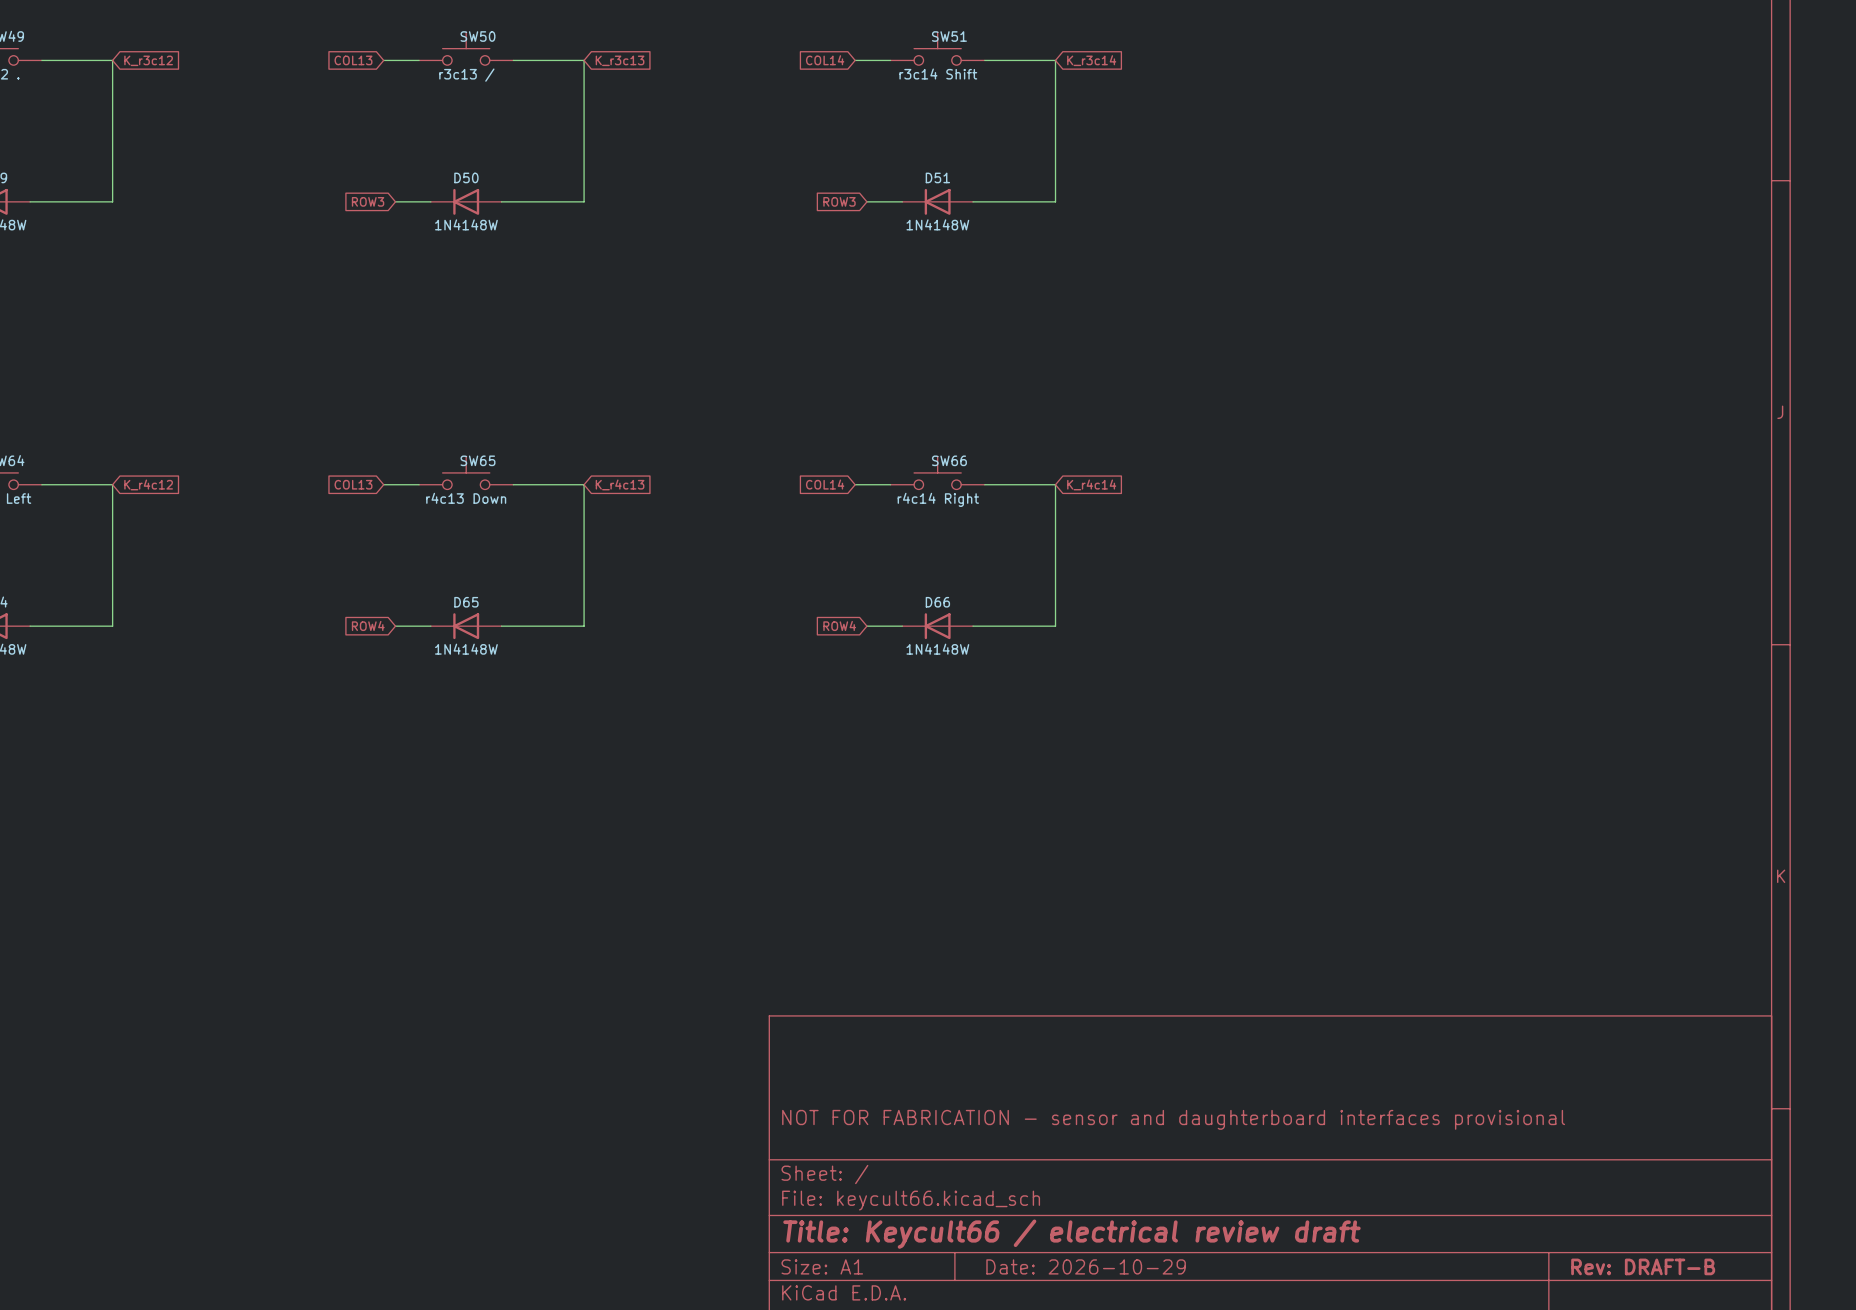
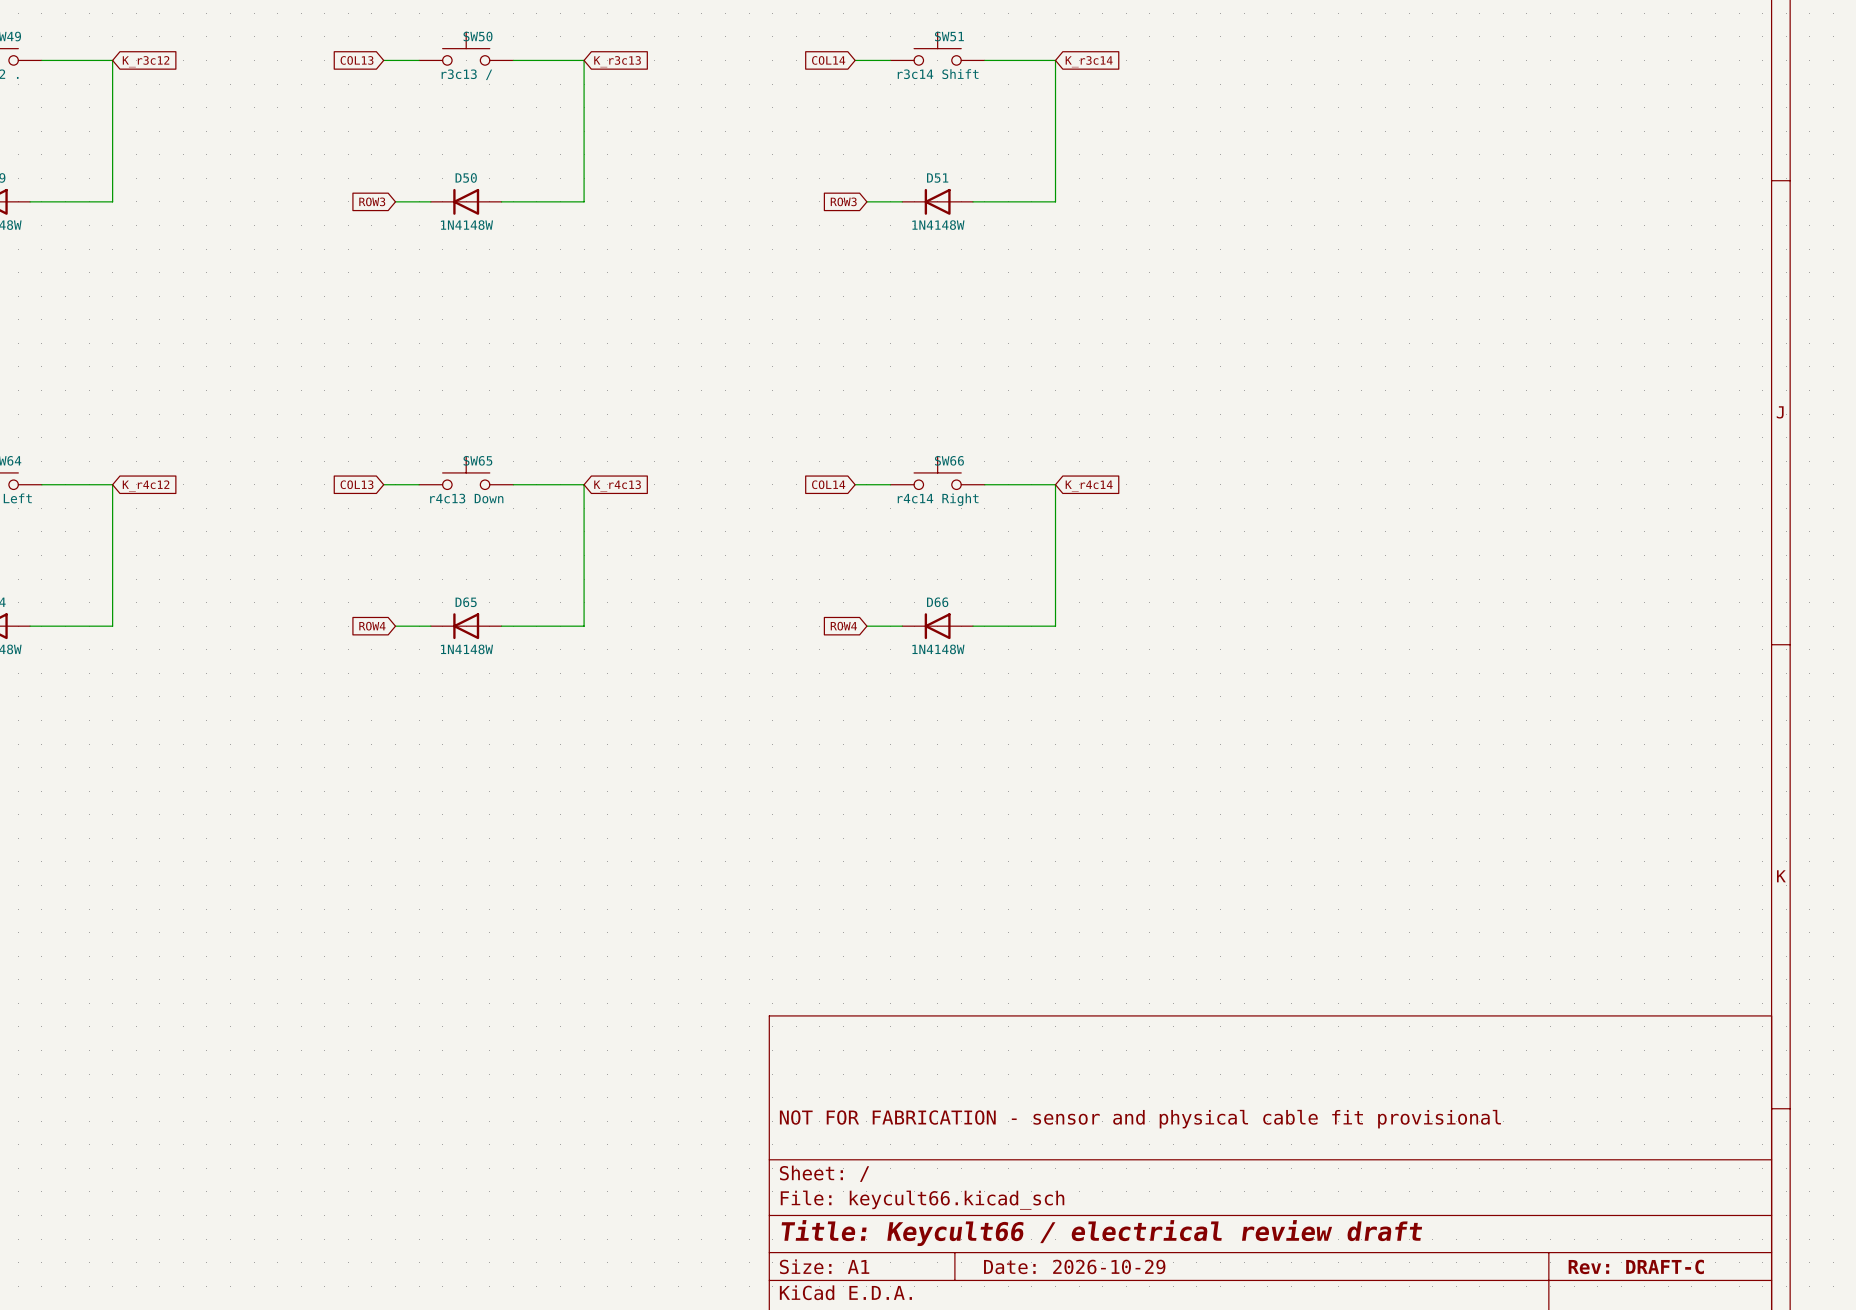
title block: NOT FOR FABRICATION - sensor and daughterboard interfaces provisional (1173, 1119) -> NOT FOR FABRICATION - sensor and physical cable fit provisional (1140, 1119)
title block: Rev: DRAFT-B (1643, 1266) -> Rev: DRAFT-C (1636, 1266)

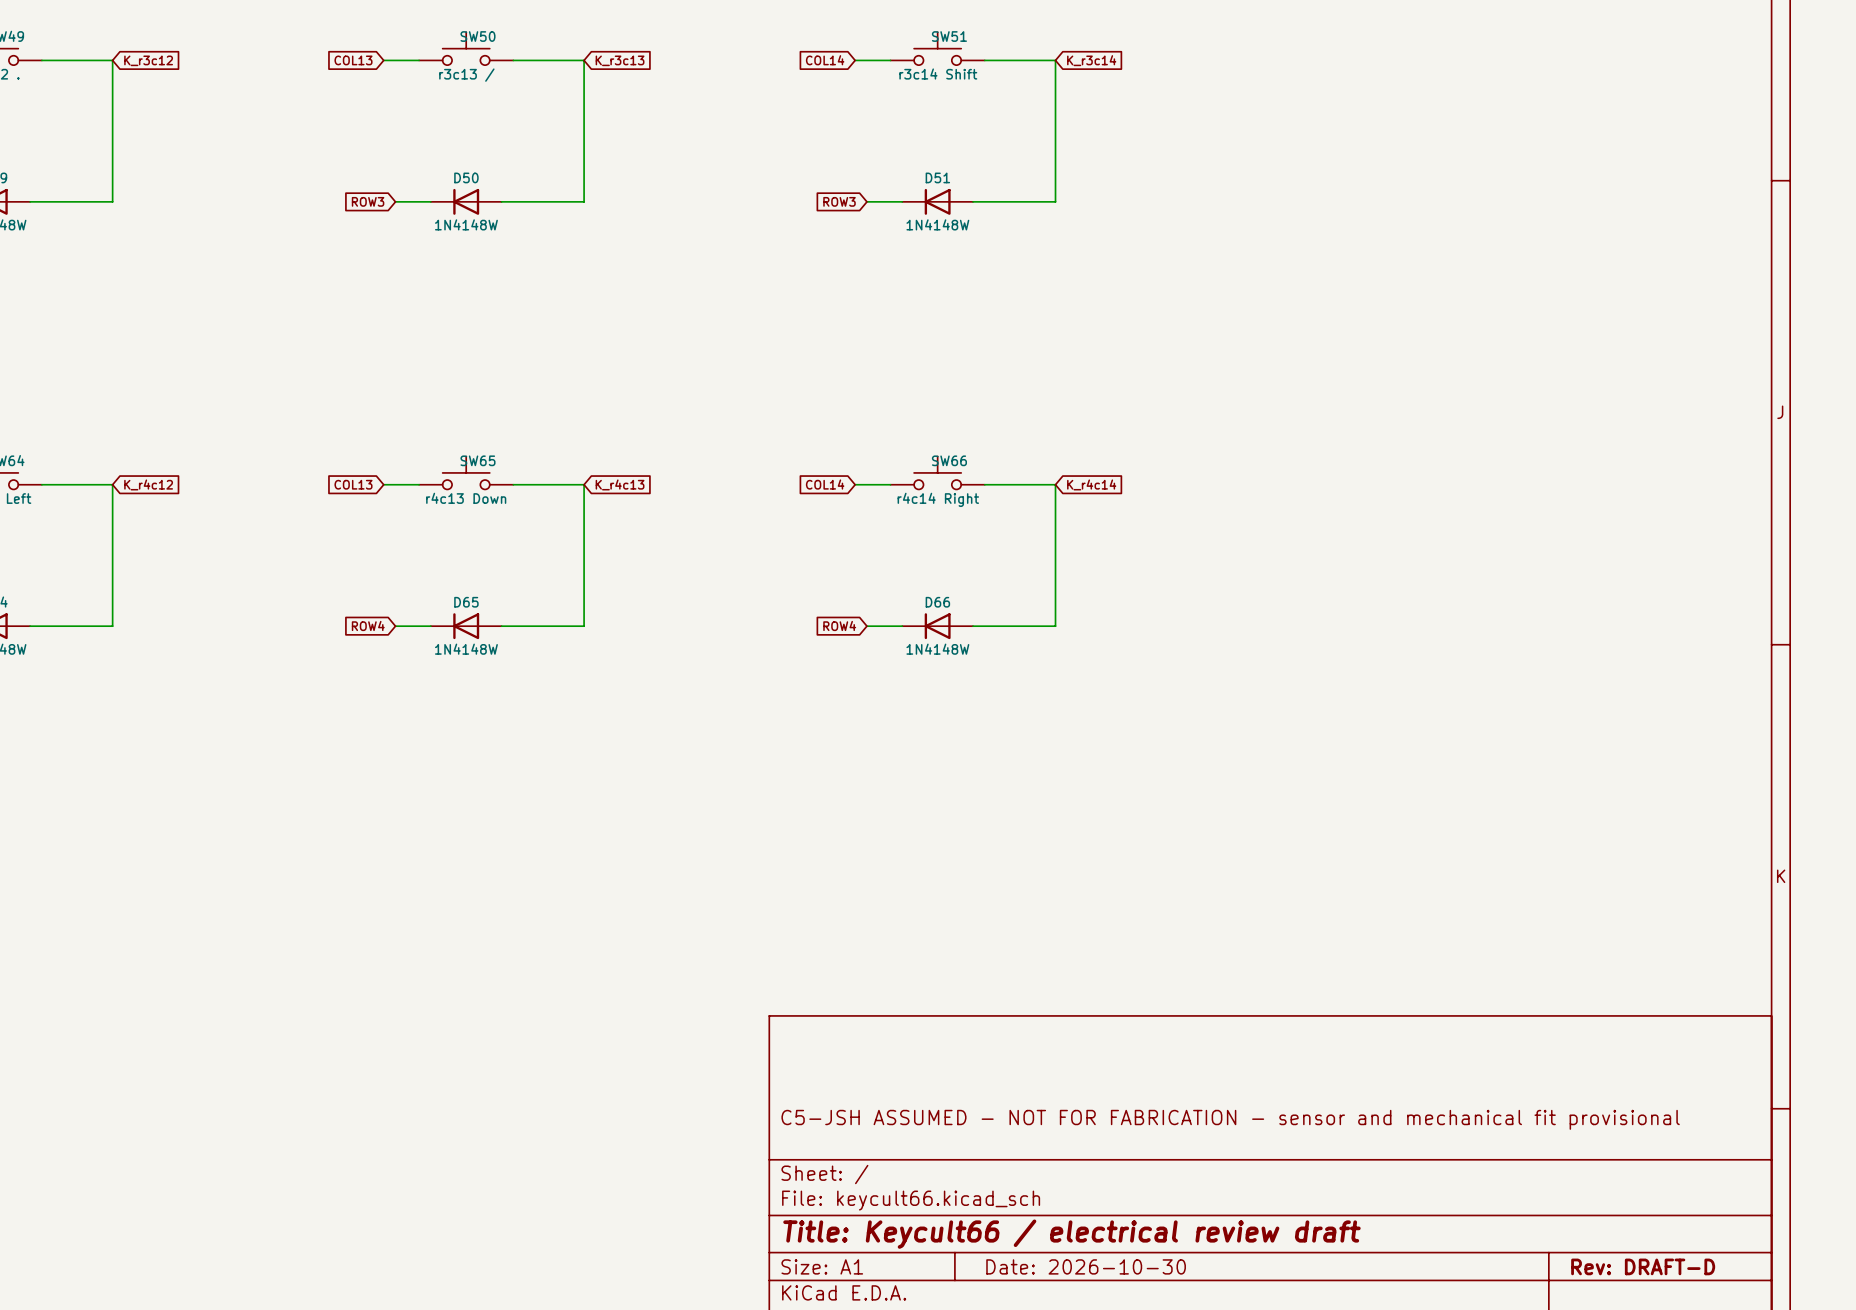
title block: NOT FOR FABRICATION - sensor and physical cable fit provisional (1140, 1119) -> C5-JSH ASSUMED - NOT FOR FABRICATION - sensor and mechanical fit provisional (1230, 1119)
title block: Date: 2026-10-29 (1074, 1266) -> Date: 2026-10-30 (1086, 1266)
title block: Rev: DRAFT-C (1636, 1266) -> Rev: DRAFT-D (1643, 1266)

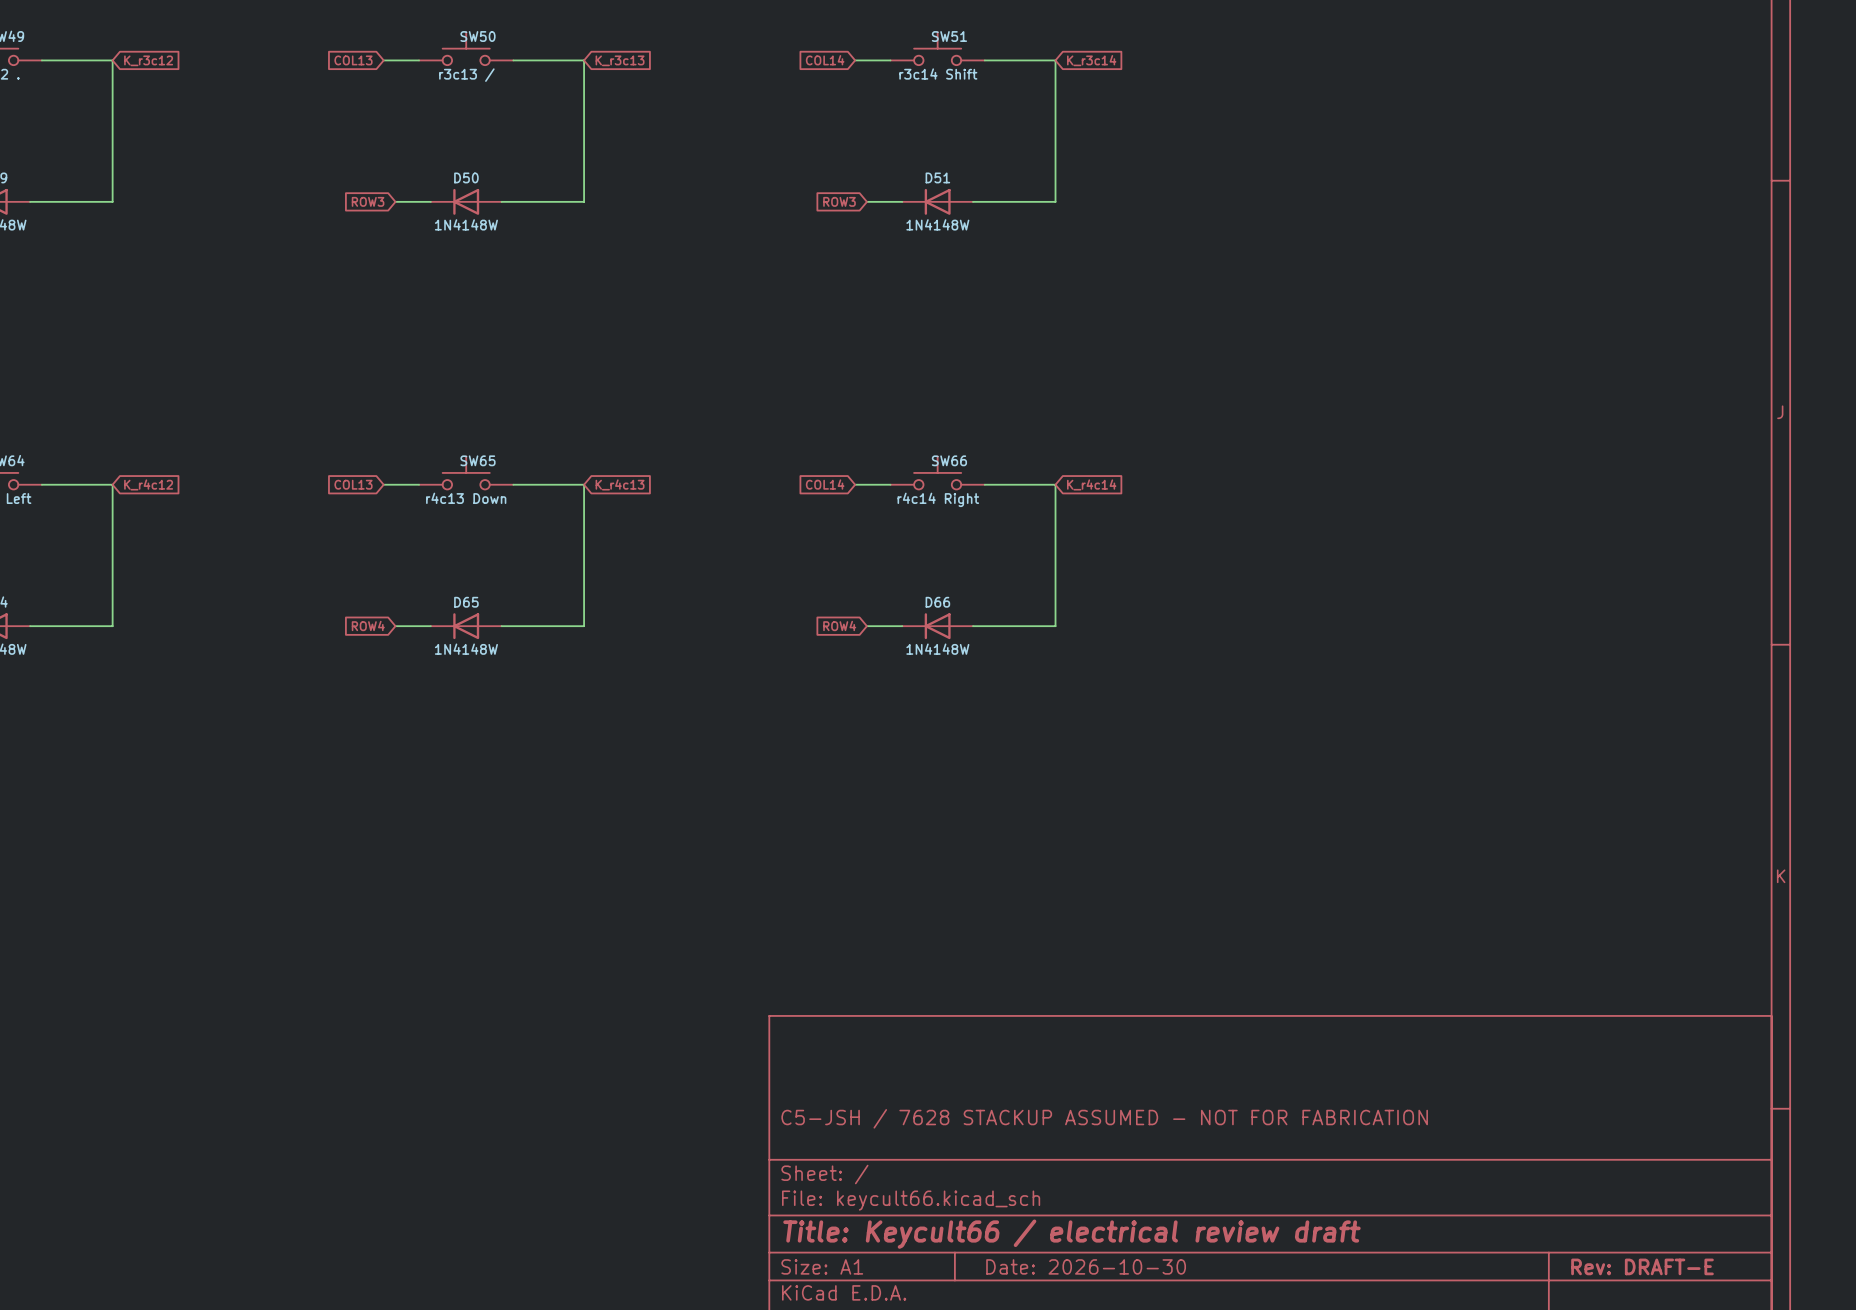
title block: C5-JSH ASSUMED - NOT FOR FABRICATION - sensor and mechanical fit provisional (1230, 1119) -> C5-JSH / 7628 STACKUP ASSUMED - NOT FOR FABRICATION (1104, 1118)
title block: Rev: DRAFT-D (1643, 1266) -> Rev: DRAFT-E (1642, 1266)

